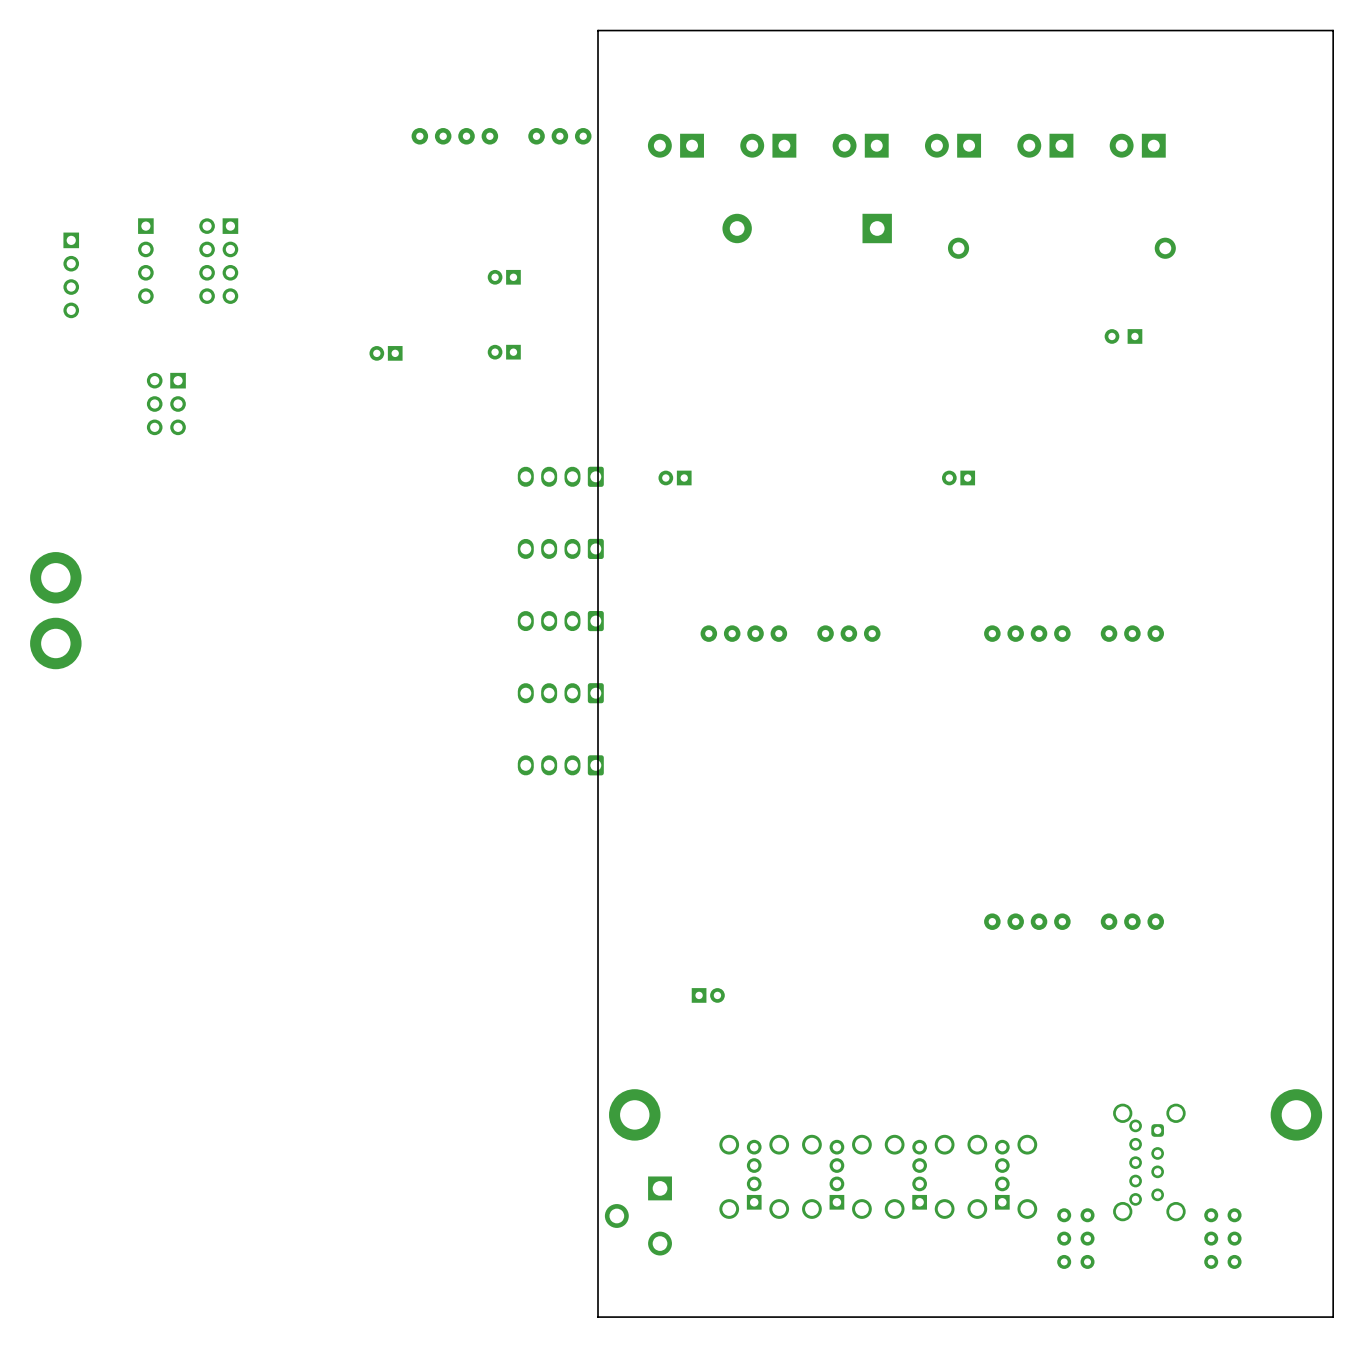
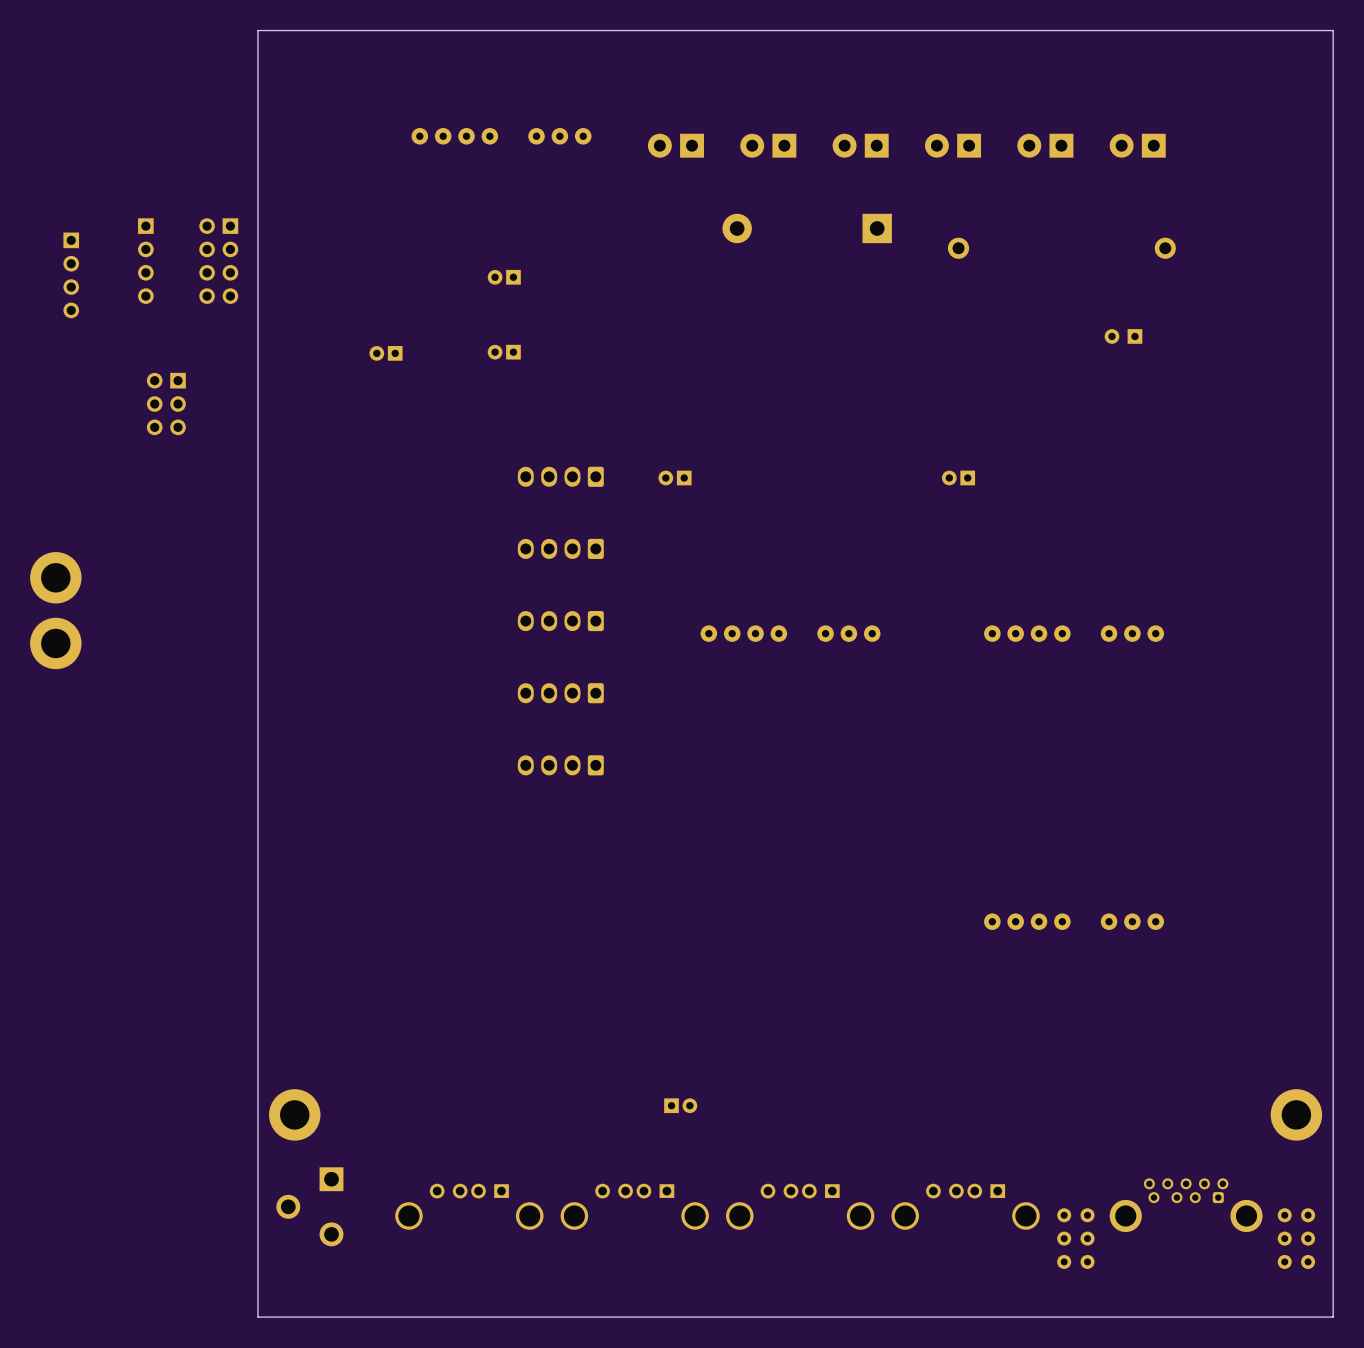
board edge: (598, 30) (598, 1317) -> (598, 30) (257, 30) (257, 1317) (598, 1317)
part position: (708, 995) -> (680, 1105)
part: none -> (294, 1114)
part: (634, 1114) -> none
part: (1149, 1162) -> none
part: (754, 1176) -> none
part: (836, 1176) -> none
part: (919, 1176) -> none
part: (1002, 1176) -> none
part: none -> (1186, 1205)
part: none -> (309, 1206)
part: none -> (469, 1206)
part: none -> (634, 1206)
part: none -> (800, 1206)
part: none -> (965, 1206)
part: (638, 1215) -> none
part position: (1222, 1238) -> (1296, 1238)

